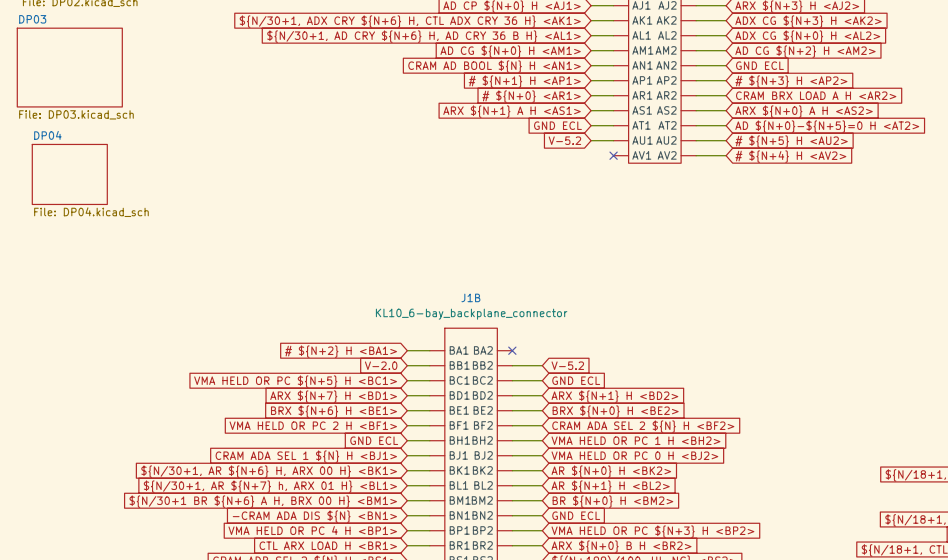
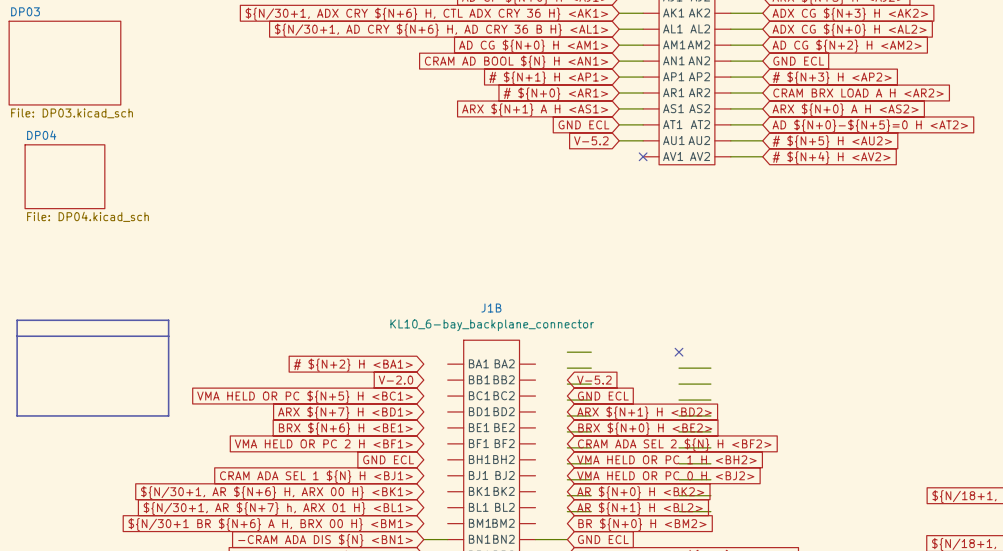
line: none -> (17, 320) (168, 320) (168, 415) (17, 415) (17, 320)
line: none -> (17, 336) (168, 336)
no-connect mark: none -> (679, 352)
wire: (407, 350) (429, 350) -> (567, 352) (591, 352)
no-connect mark: (512, 350) -> none
wire: (407, 365) (429, 365) -> (567, 368) (591, 368)
wire: (512, 365) (542, 365) -> (679, 368) (710, 368)
wire: (407, 380) (429, 380) -> (567, 384) (591, 384)
wire: (512, 380) (542, 380) -> (679, 384) (710, 384)
wire: (407, 395) (429, 395) -> (567, 400) (591, 400)
wire: (512, 395) (542, 395) -> (679, 400) (710, 400)
wire: (407, 410) (429, 410) -> (567, 415) (591, 415)
wire: (512, 410) (542, 410) -> (679, 415) (710, 415)
wire: (407, 425) (429, 425) -> (567, 431) (591, 431)
wire: (512, 425) (542, 425) -> (679, 431) (710, 431)
wire: (407, 440) (429, 440) -> (567, 447) (591, 447)
wire: (512, 440) (542, 440) -> (679, 447) (710, 447)
wire: (407, 455) (429, 455) -> (567, 463) (591, 463)
wire: (512, 455) (542, 455) -> (679, 463) (710, 463)
wire: (407, 470) (429, 470) -> (567, 479) (591, 479)
wire: (512, 470) (542, 470) -> (679, 479) (710, 479)
wire: (407, 485) (429, 485) -> (567, 495) (591, 495)
wire: (512, 485) (542, 485) -> (679, 495) (710, 495)
wire: (407, 500) (429, 500) -> (567, 511) (591, 511)
wire: (512, 500) (542, 500) -> (679, 511) (710, 511)

